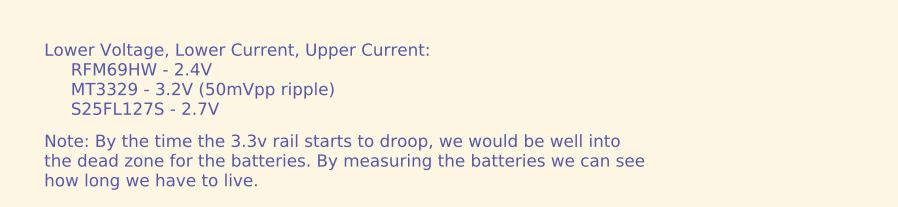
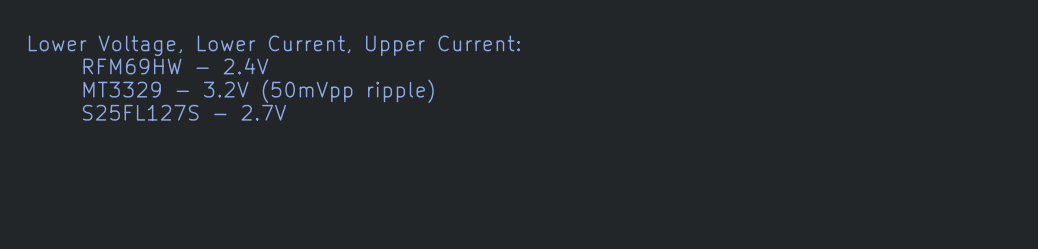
text: Note: By the time the 3.3v rail starts to droop, we would be well into (332, 142) -> none
text: the dead zone for the batteries. By measuring the batteries we can see (344, 161) -> none
text: how long we have to live. (151, 181) -> none

